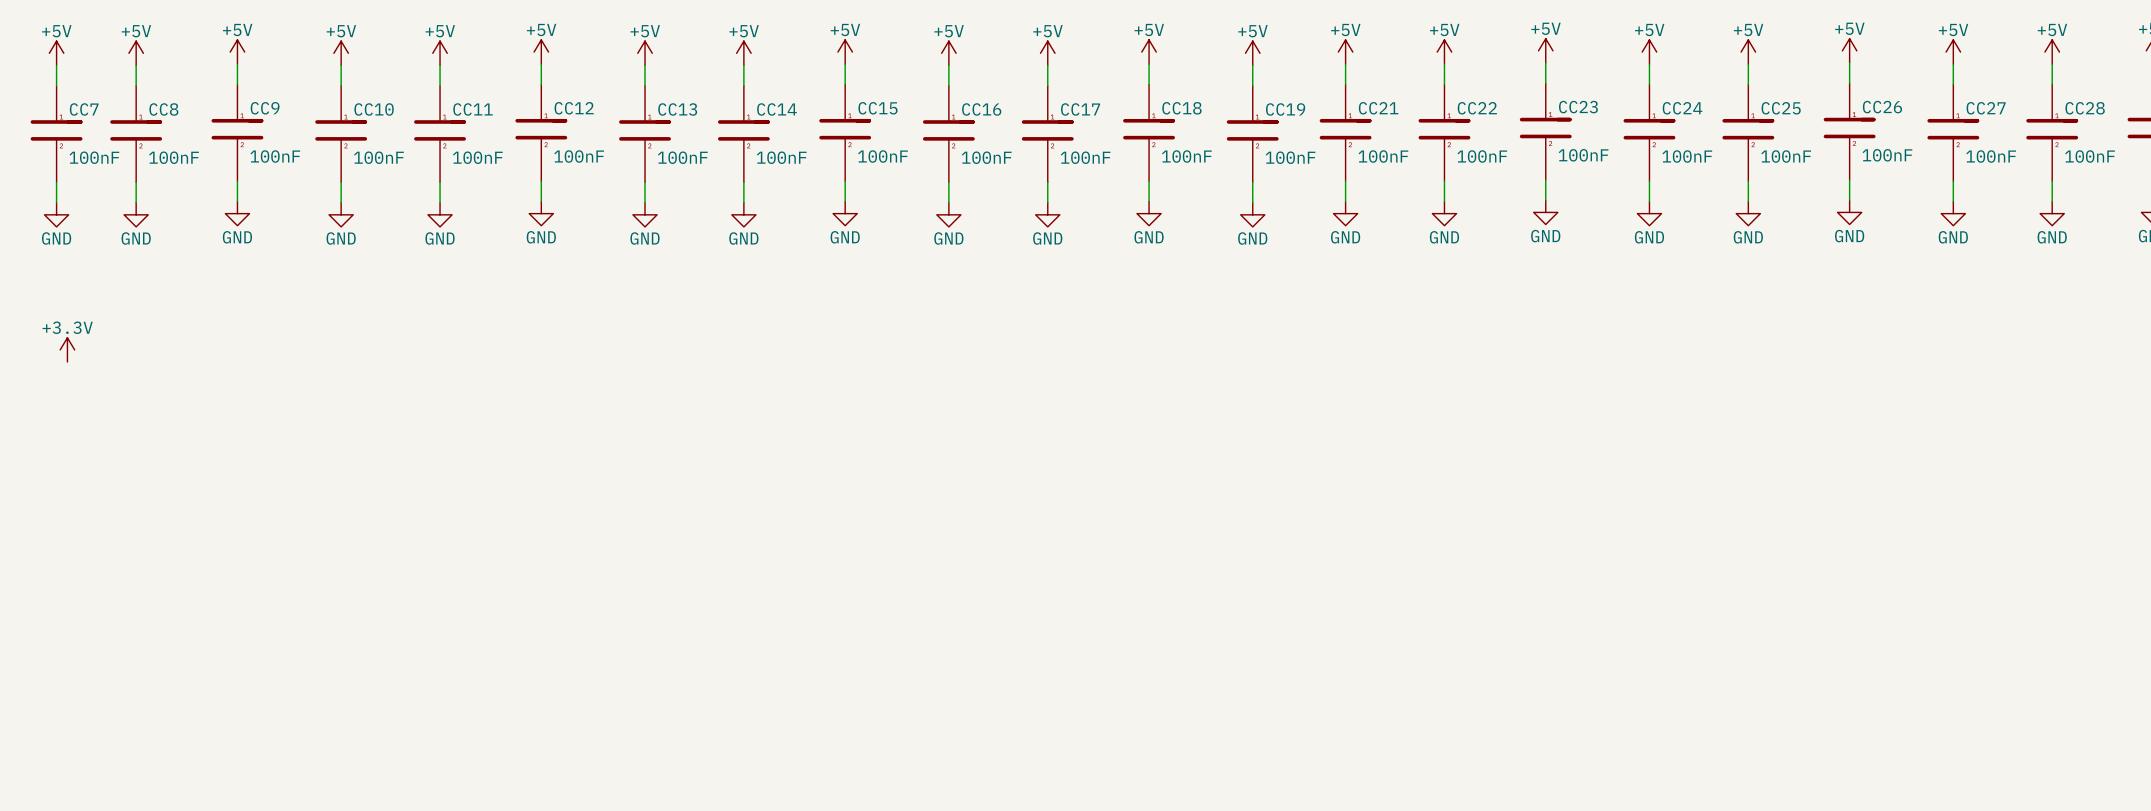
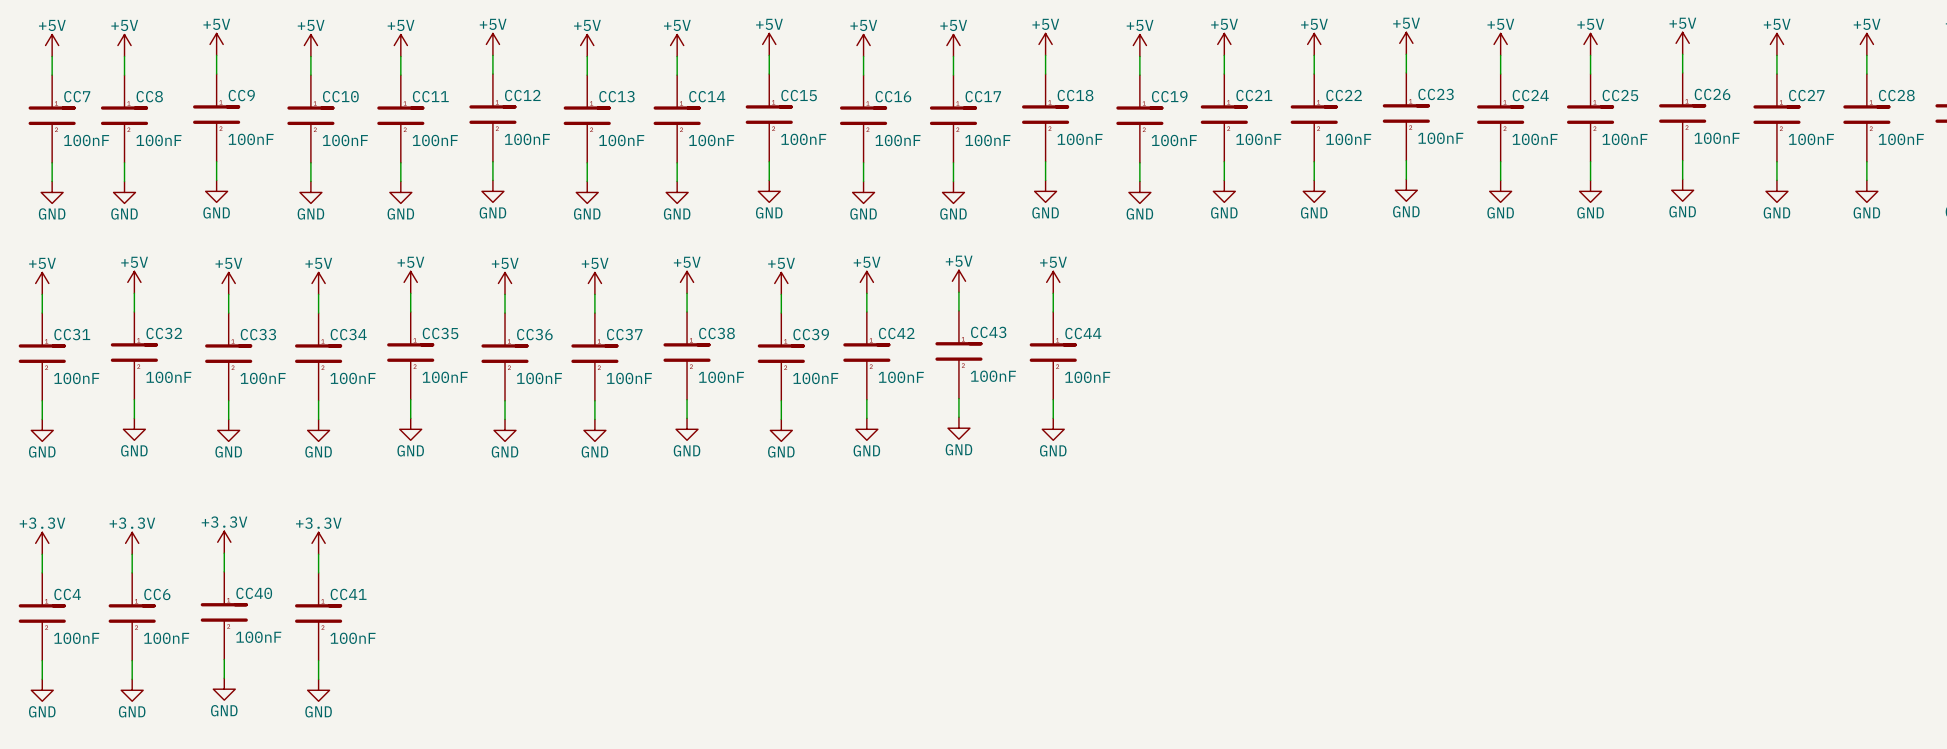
power symbol: none -> +5V (958, 281)
power symbol: none -> +5V (134, 282)
power symbol: none -> +5V (410, 282)
power symbol: none -> +5V (687, 282)
power symbol: none -> +5V (866, 282)
power symbol: none -> +5V (1053, 282)
power symbol: none -> +5V (42, 283)
power symbol: none -> +5V (228, 283)
power symbol: none -> +5V (318, 283)
power symbol: none -> +5V (505, 283)
power symbol: none -> +5V (594, 283)
power symbol: none -> +5V (781, 283)
wire: none -> (958, 292) (958, 310)
wire: none -> (134, 293) (134, 311)
wire: none -> (410, 293) (410, 311)
wire: none -> (687, 293) (687, 311)
wire: none -> (866, 293) (866, 311)
wire: none -> (1053, 293) (1053, 311)
wire: none -> (42, 294) (42, 313)
wire: none -> (228, 294) (228, 313)
wire: none -> (318, 294) (318, 313)
wire: none -> (505, 294) (505, 313)
wire: none -> (594, 294) (594, 313)
wire: none -> (781, 294) (781, 313)
power symbol: +3.3V (67, 349) -> none
CC43: none -> 100nF (958, 354)
CC32: none -> 100nF (134, 355)
CC35: none -> 100nF (410, 355)
CC38: none -> 100nF (687, 355)
CC42: none -> 100nF (866, 355)
CC44: none -> 100nF (1053, 355)
CC31: none -> 100nF (42, 356)
CC33: none -> 100nF (228, 356)
CC34: none -> 100nF (318, 356)
CC36: none -> 100nF (505, 356)
CC37: none -> 100nF (594, 356)
CC39: none -> 100nF (781, 356)
wire: none -> (958, 398) (958, 417)
wire: none -> (134, 399) (134, 418)
wire: none -> (410, 399) (410, 418)
wire: none -> (687, 399) (687, 418)
wire: none -> (866, 399) (866, 418)
wire: none -> (1053, 399) (1053, 418)
wire: none -> (42, 400) (42, 419)
wire: none -> (228, 400) (228, 419)
wire: none -> (318, 400) (318, 419)
wire: none -> (505, 400) (505, 419)
wire: none -> (594, 400) (594, 419)
wire: none -> (781, 400) (781, 419)
power symbol: none -> GND (958, 428)
power symbol: none -> GND (134, 429)
power symbol: none -> GND (410, 429)
power symbol: none -> GND (687, 429)
power symbol: none -> GND (866, 429)
power symbol: none -> GND (1053, 429)
power symbol: none -> GND (42, 430)
power symbol: none -> GND (228, 430)
power symbol: none -> GND (318, 430)
power symbol: none -> GND (505, 430)
power symbol: none -> GND (594, 430)
power symbol: none -> GND (781, 430)
power symbol: none -> +3.3V (224, 542)
power symbol: none -> +3.3V (42, 543)
power symbol: none -> +3.3V (132, 543)
power symbol: none -> +3.3V (318, 543)
wire: none -> (224, 553) (224, 571)
wire: none -> (42, 554) (42, 572)
wire: none -> (132, 554) (132, 572)
wire: none -> (318, 554) (318, 572)
CC40: none -> 100nF (224, 615)
CC4: none -> 100nF (42, 616)
CC6: none -> 100nF (132, 616)
CC41: none -> 100nF (318, 616)
wire: none -> (224, 659) (224, 678)
wire: none -> (42, 660) (42, 679)
wire: none -> (132, 660) (132, 679)
wire: none -> (318, 660) (318, 679)
power symbol: none -> GND (224, 689)
power symbol: none -> GND (42, 690)
power symbol: none -> GND (132, 690)
power symbol: none -> GND (318, 690)

